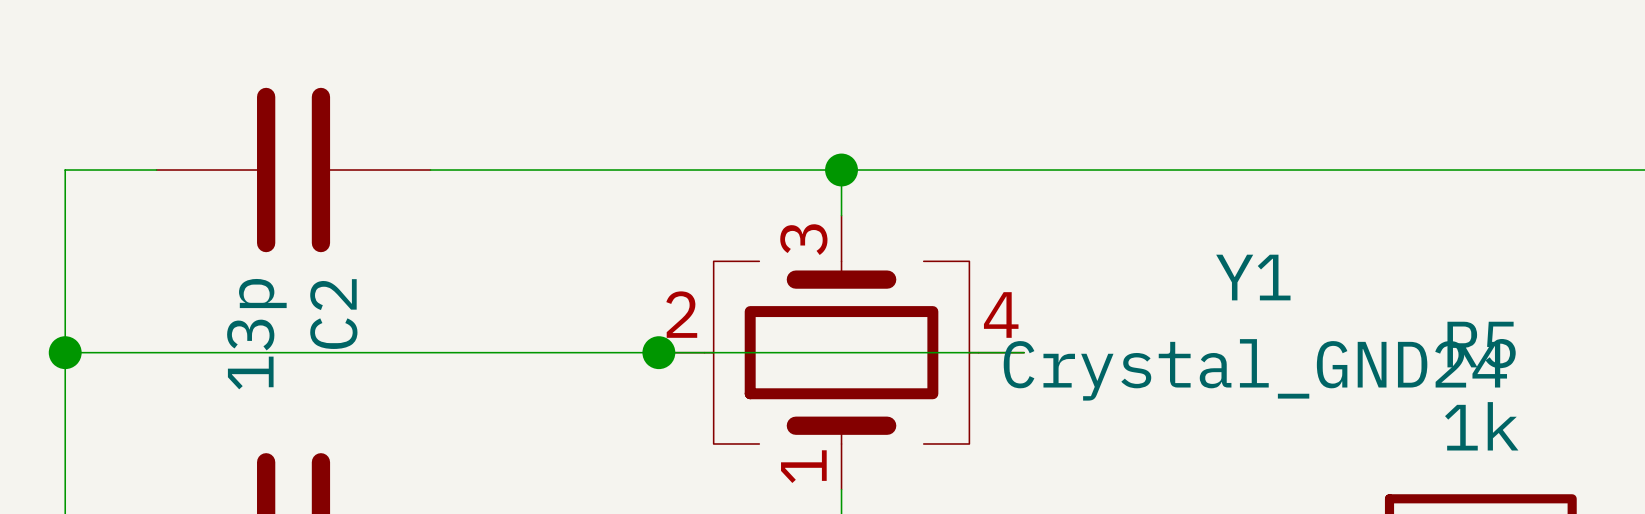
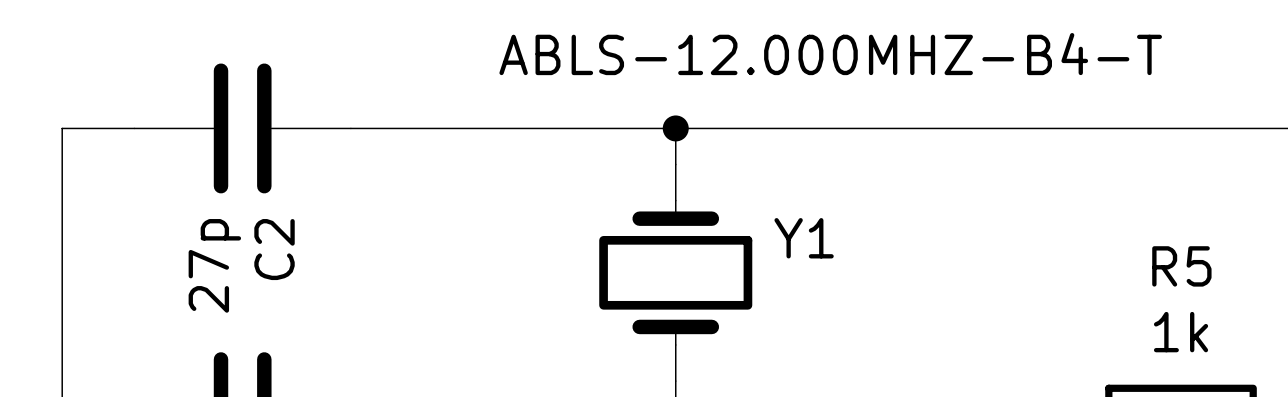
Y1 symbol: [658, 215, 1025, 490] -> [599, 164, 753, 382]
Y1 name position: Y1 (1253, 277) -> Y1 (804, 238)
C2 value: 13p (256, 334) -> 27p (214, 265)
wire: (65, 352) (1024, 352) -> none
junction: (65, 352) -> none
junction: (658, 352) -> none
Y1 value: Crystal_GND24 (1255, 369) -> ABLS-12.000MHZ-B4-T (830, 54)

